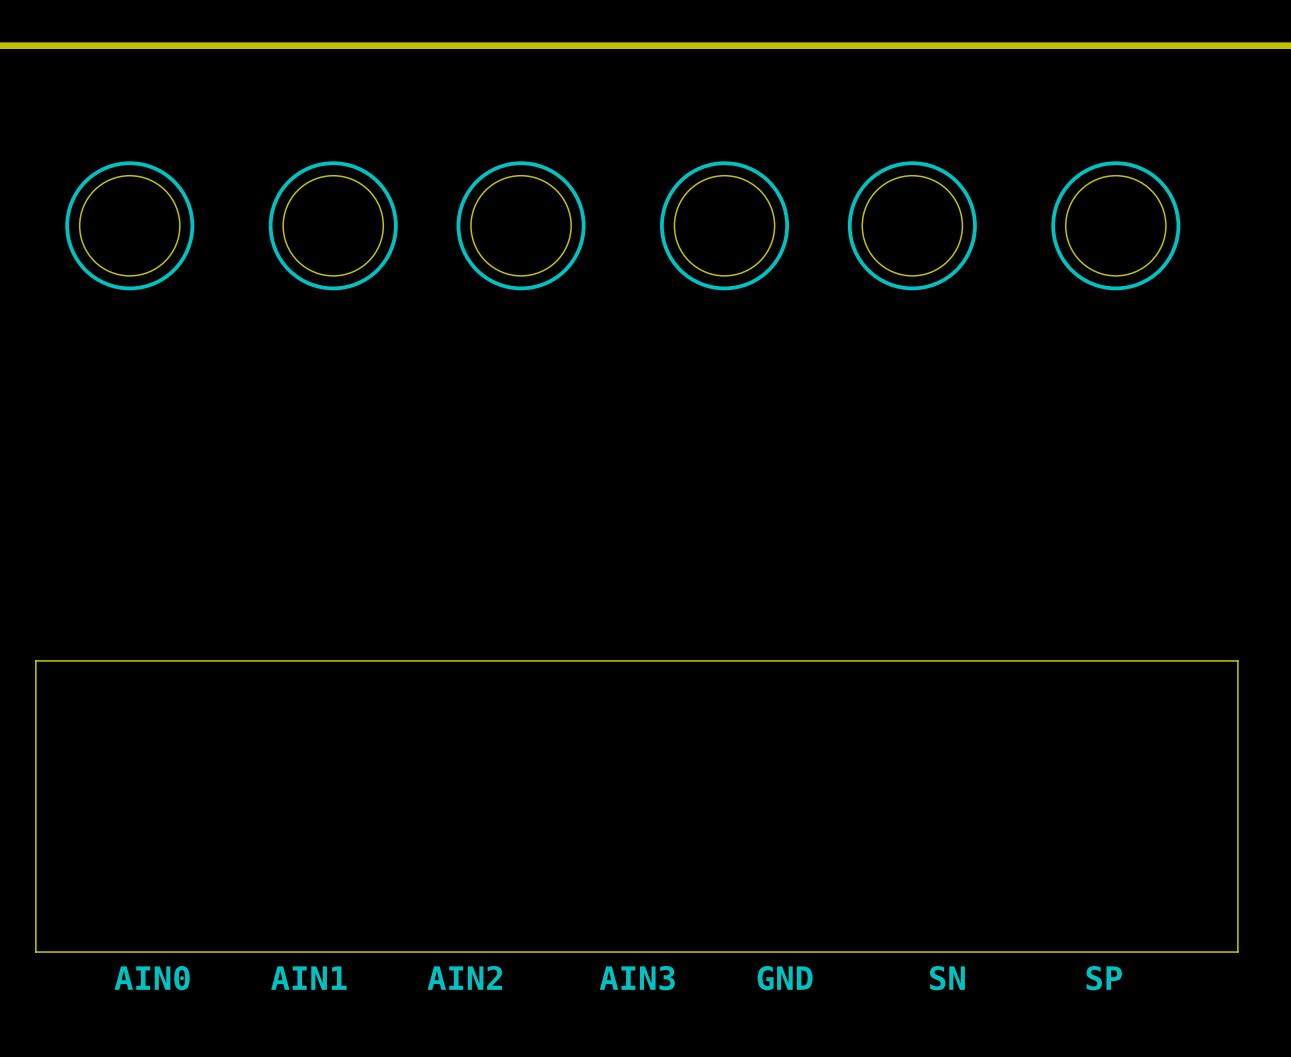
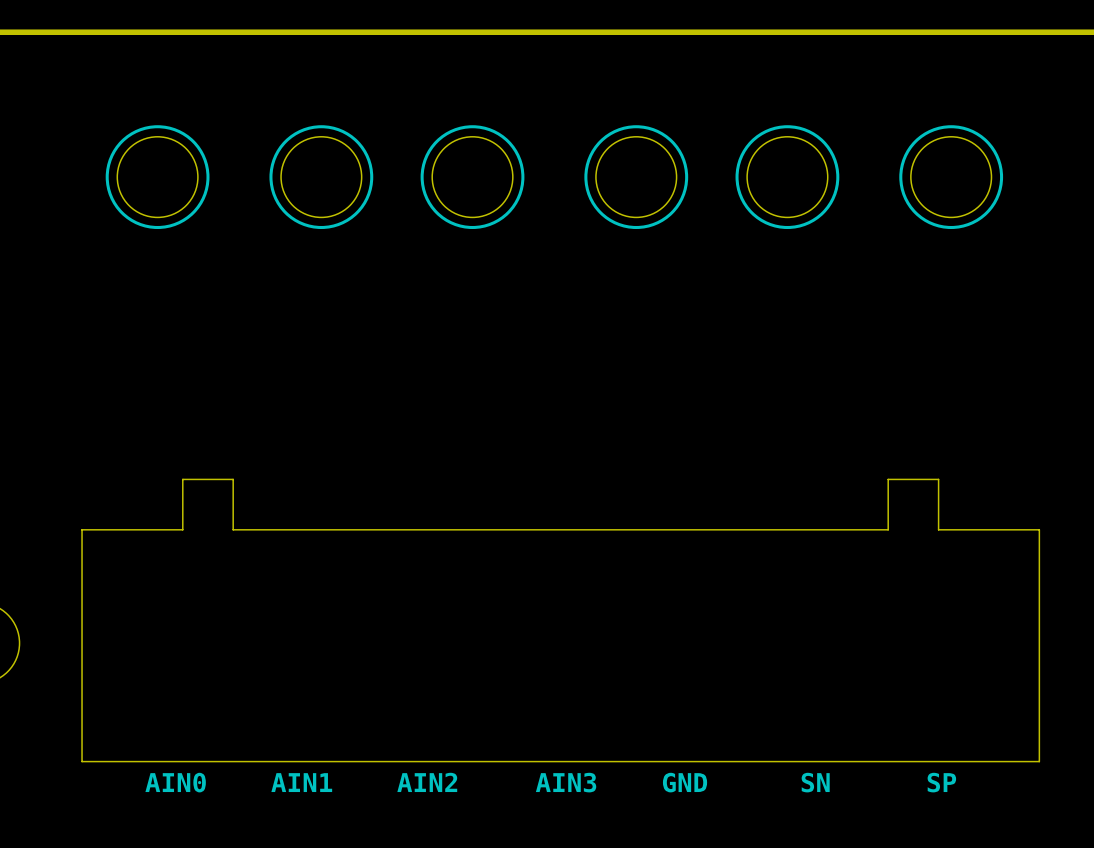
board edge: (35, 664) (35, 660) (1237, 660) (1237, 952) (1225, 952) -> (82, 529) (182, 529) (182, 479) (233, 479) (233, 529) (888, 529) (888, 479) (938, 479) (938, 529) (1039, 529) (1039, 761)

